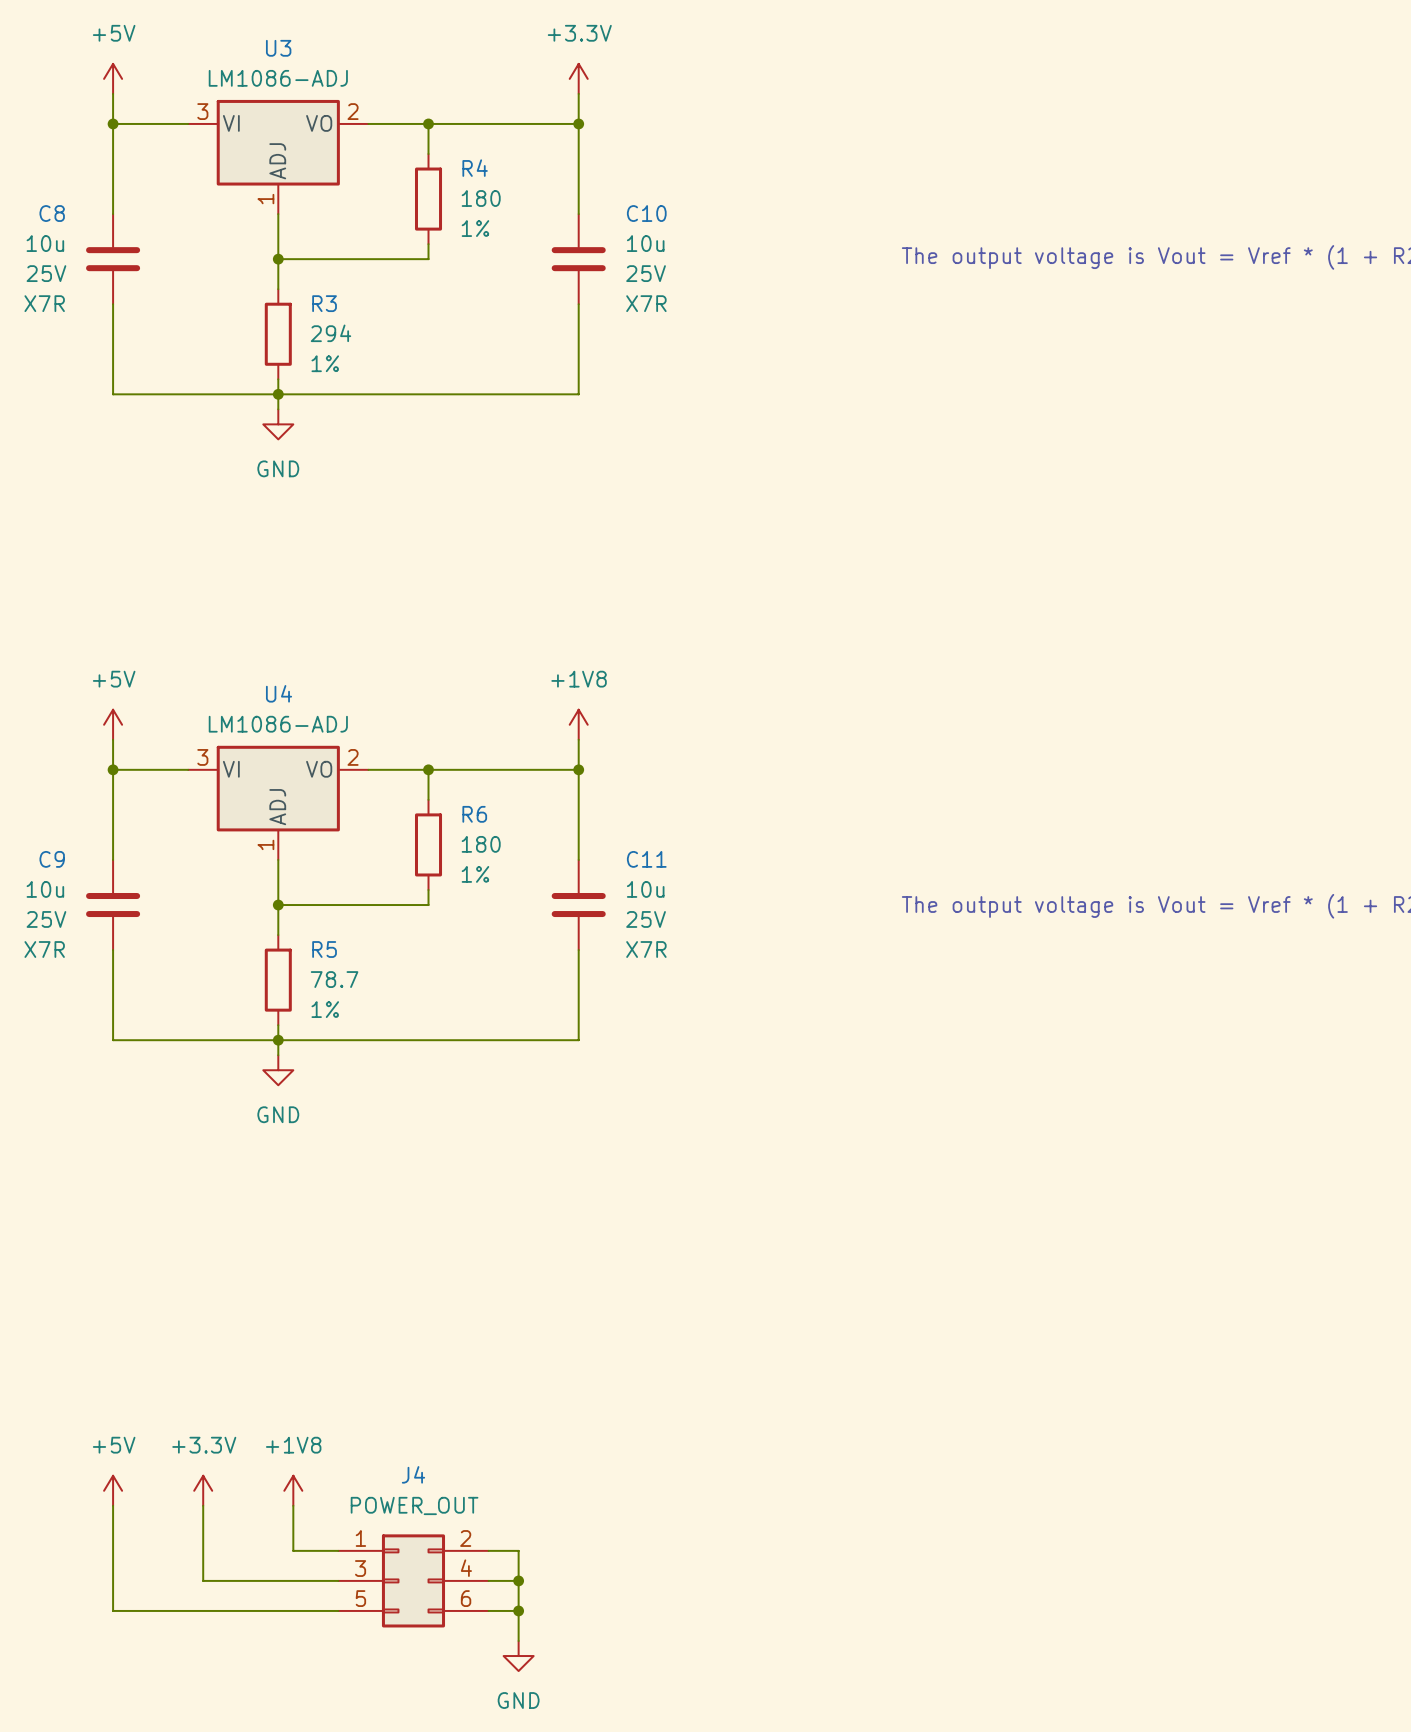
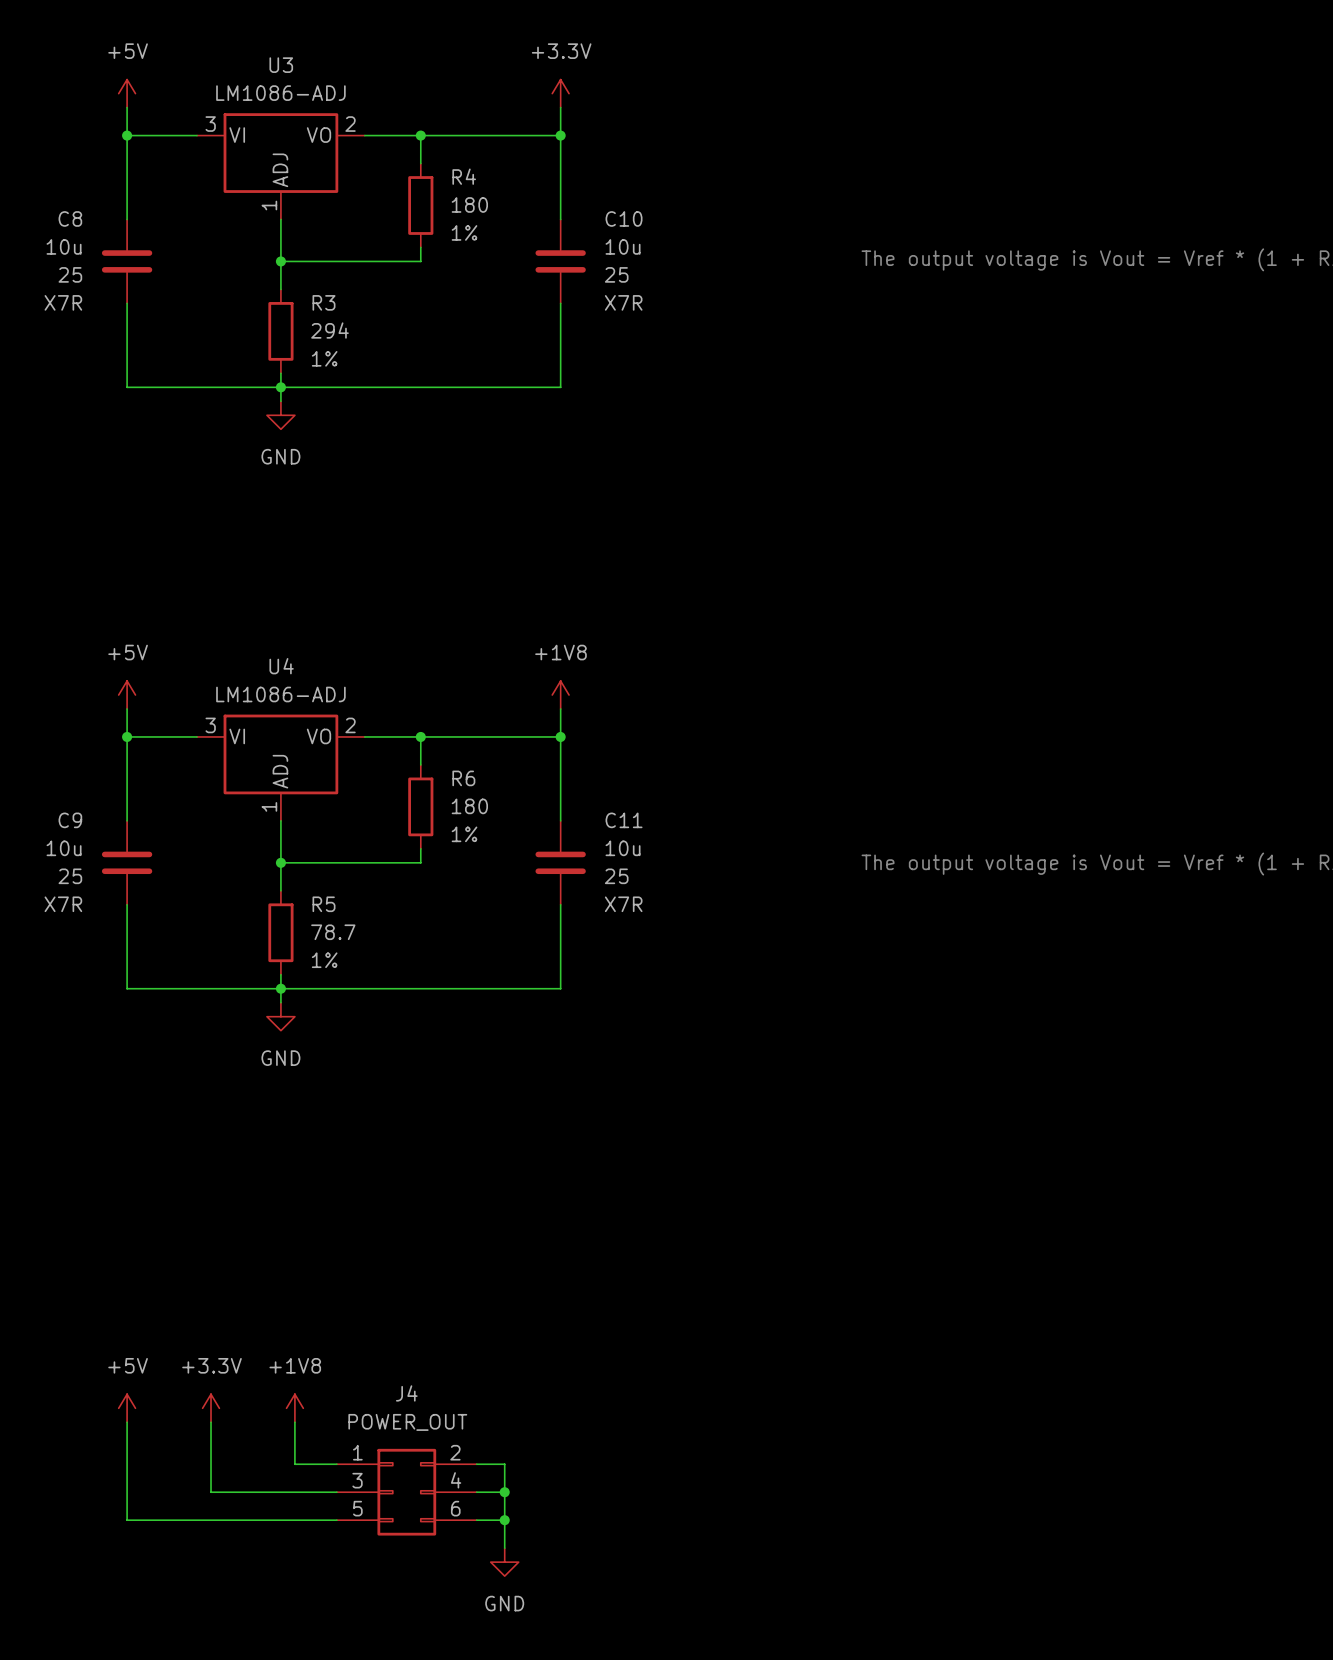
C8 text: 25V (46, 273) -> 25 (70, 274)
C10 text: 25V (646, 273) -> 25 (616, 274)
C9 text: 25V (46, 919) -> 25 (70, 876)
C11 text: 25V (646, 919) -> 25 (616, 876)

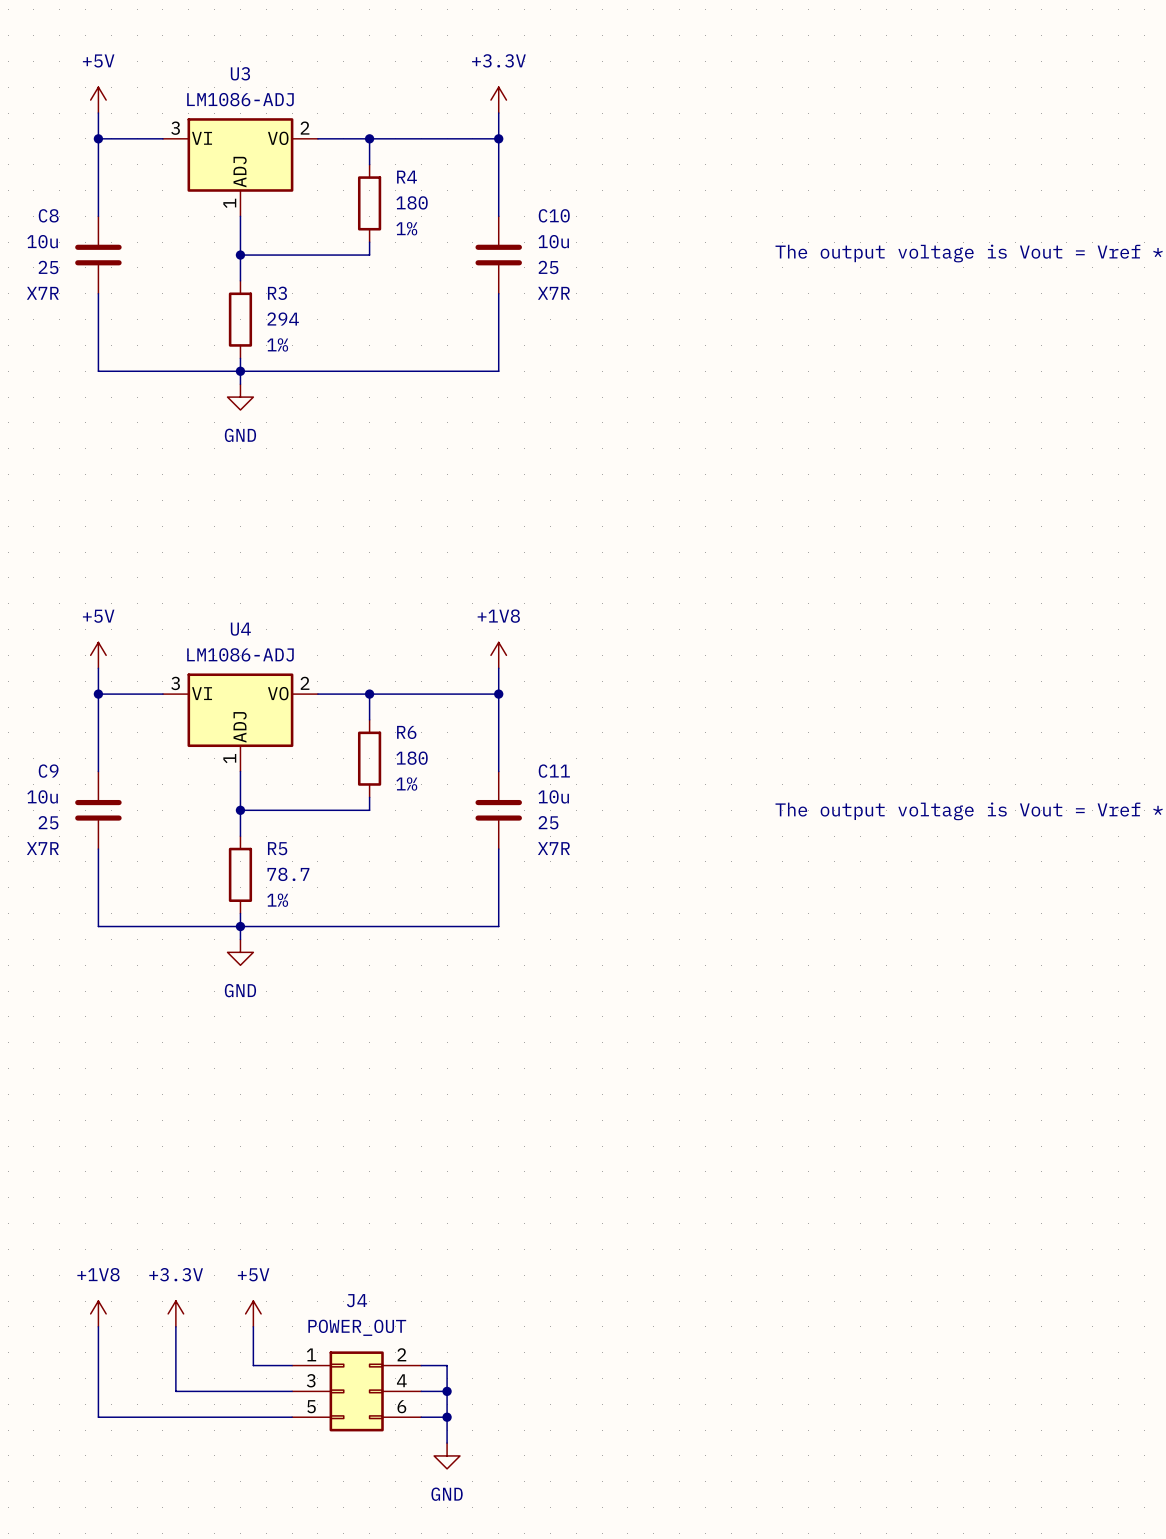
power symbol: +5V (127, 1408) -> +1V8 (98, 1313)
power symbol: +1V8 (294, 1408) -> +5V (253, 1313)

